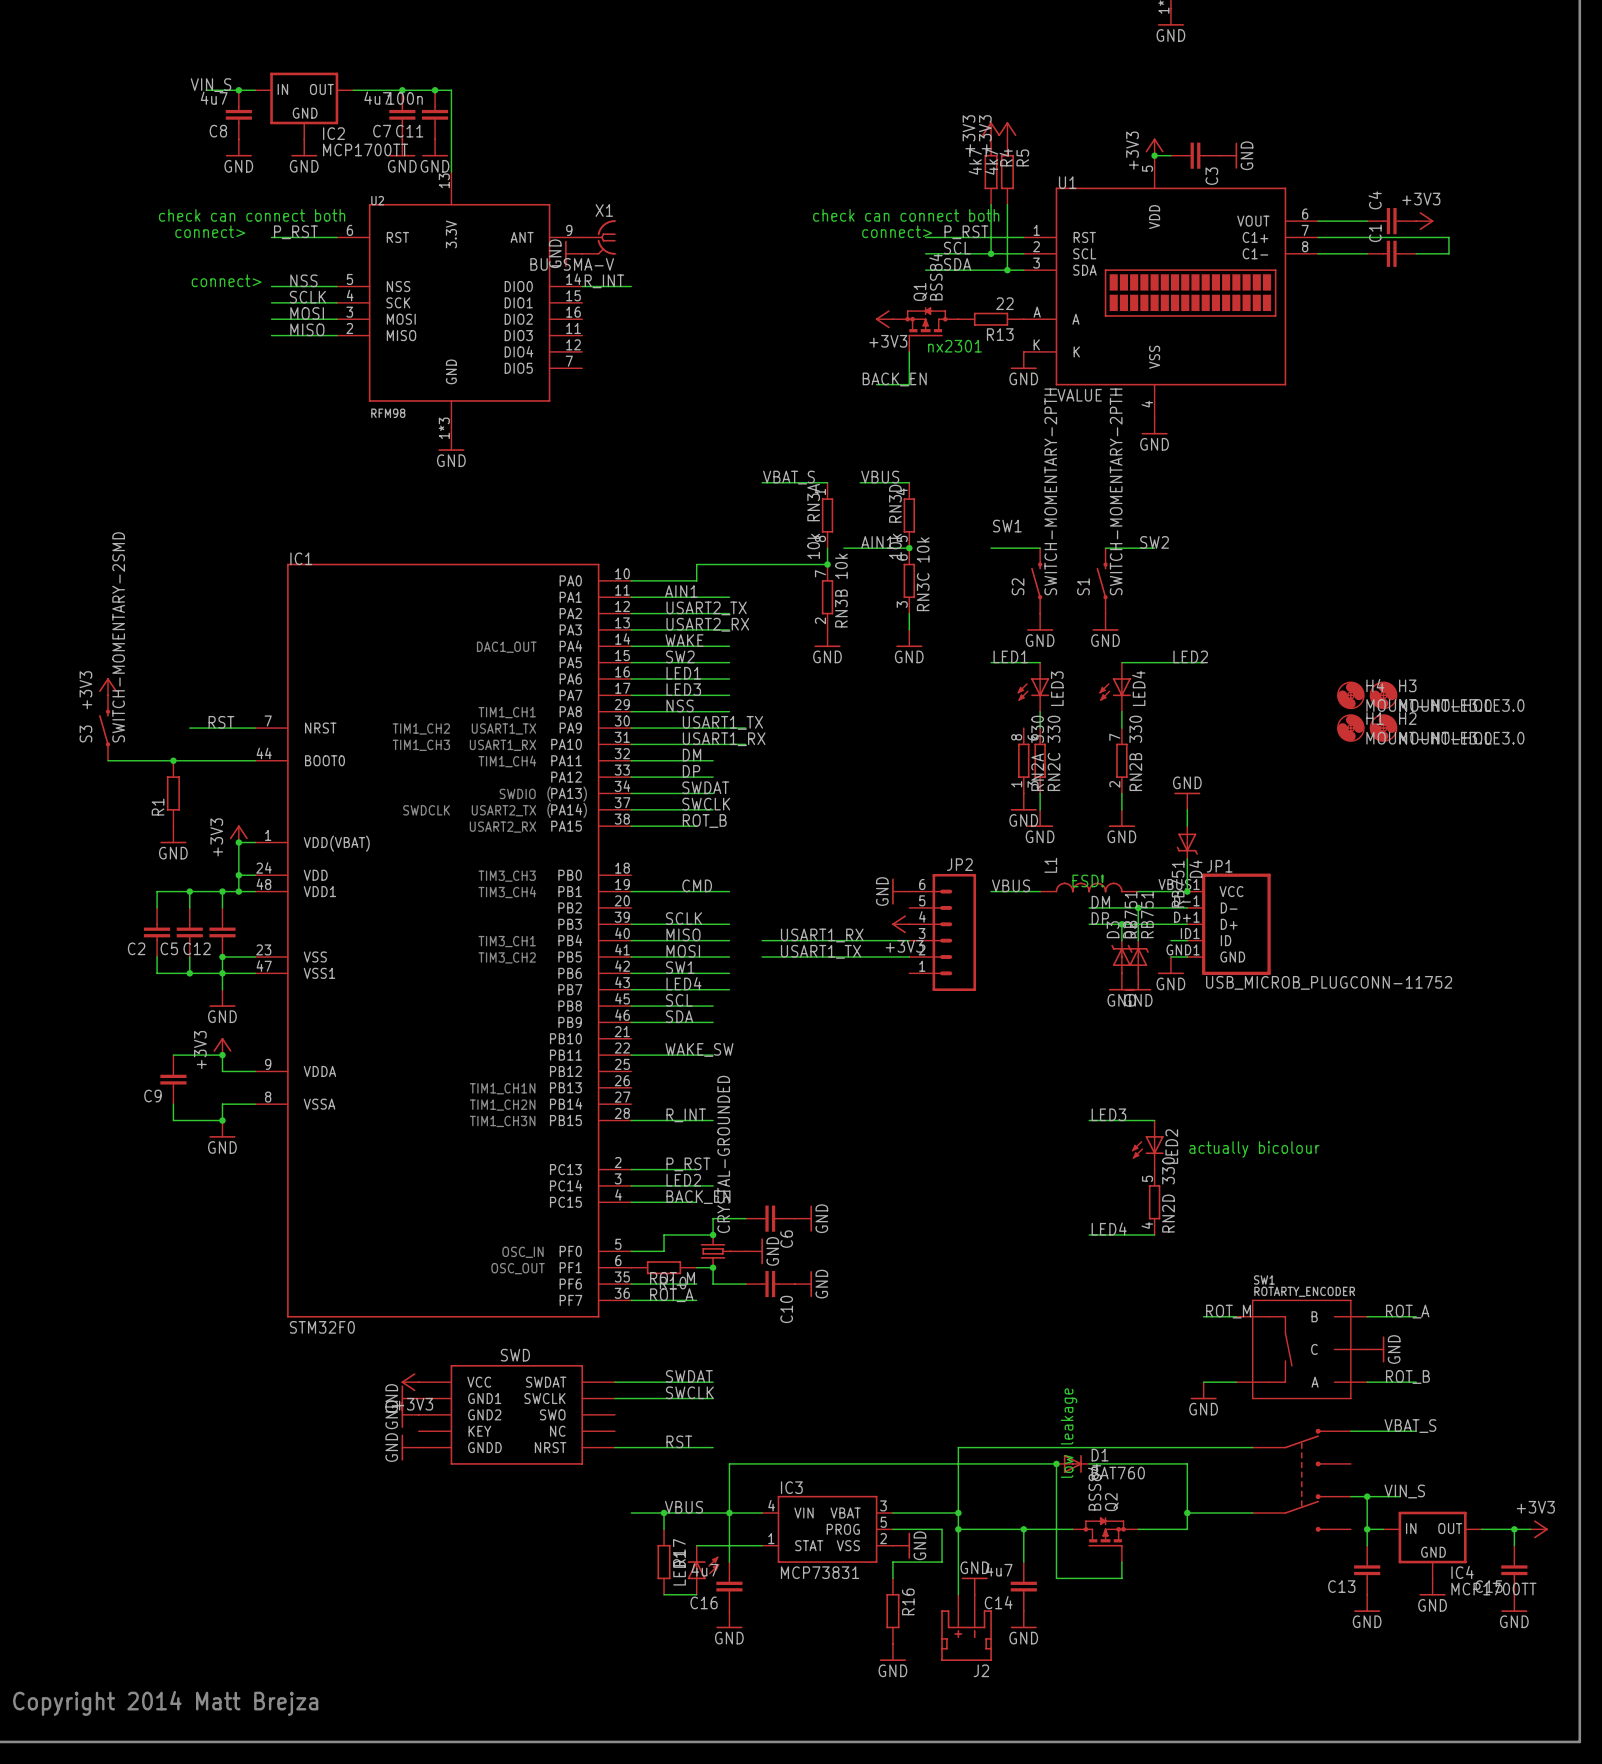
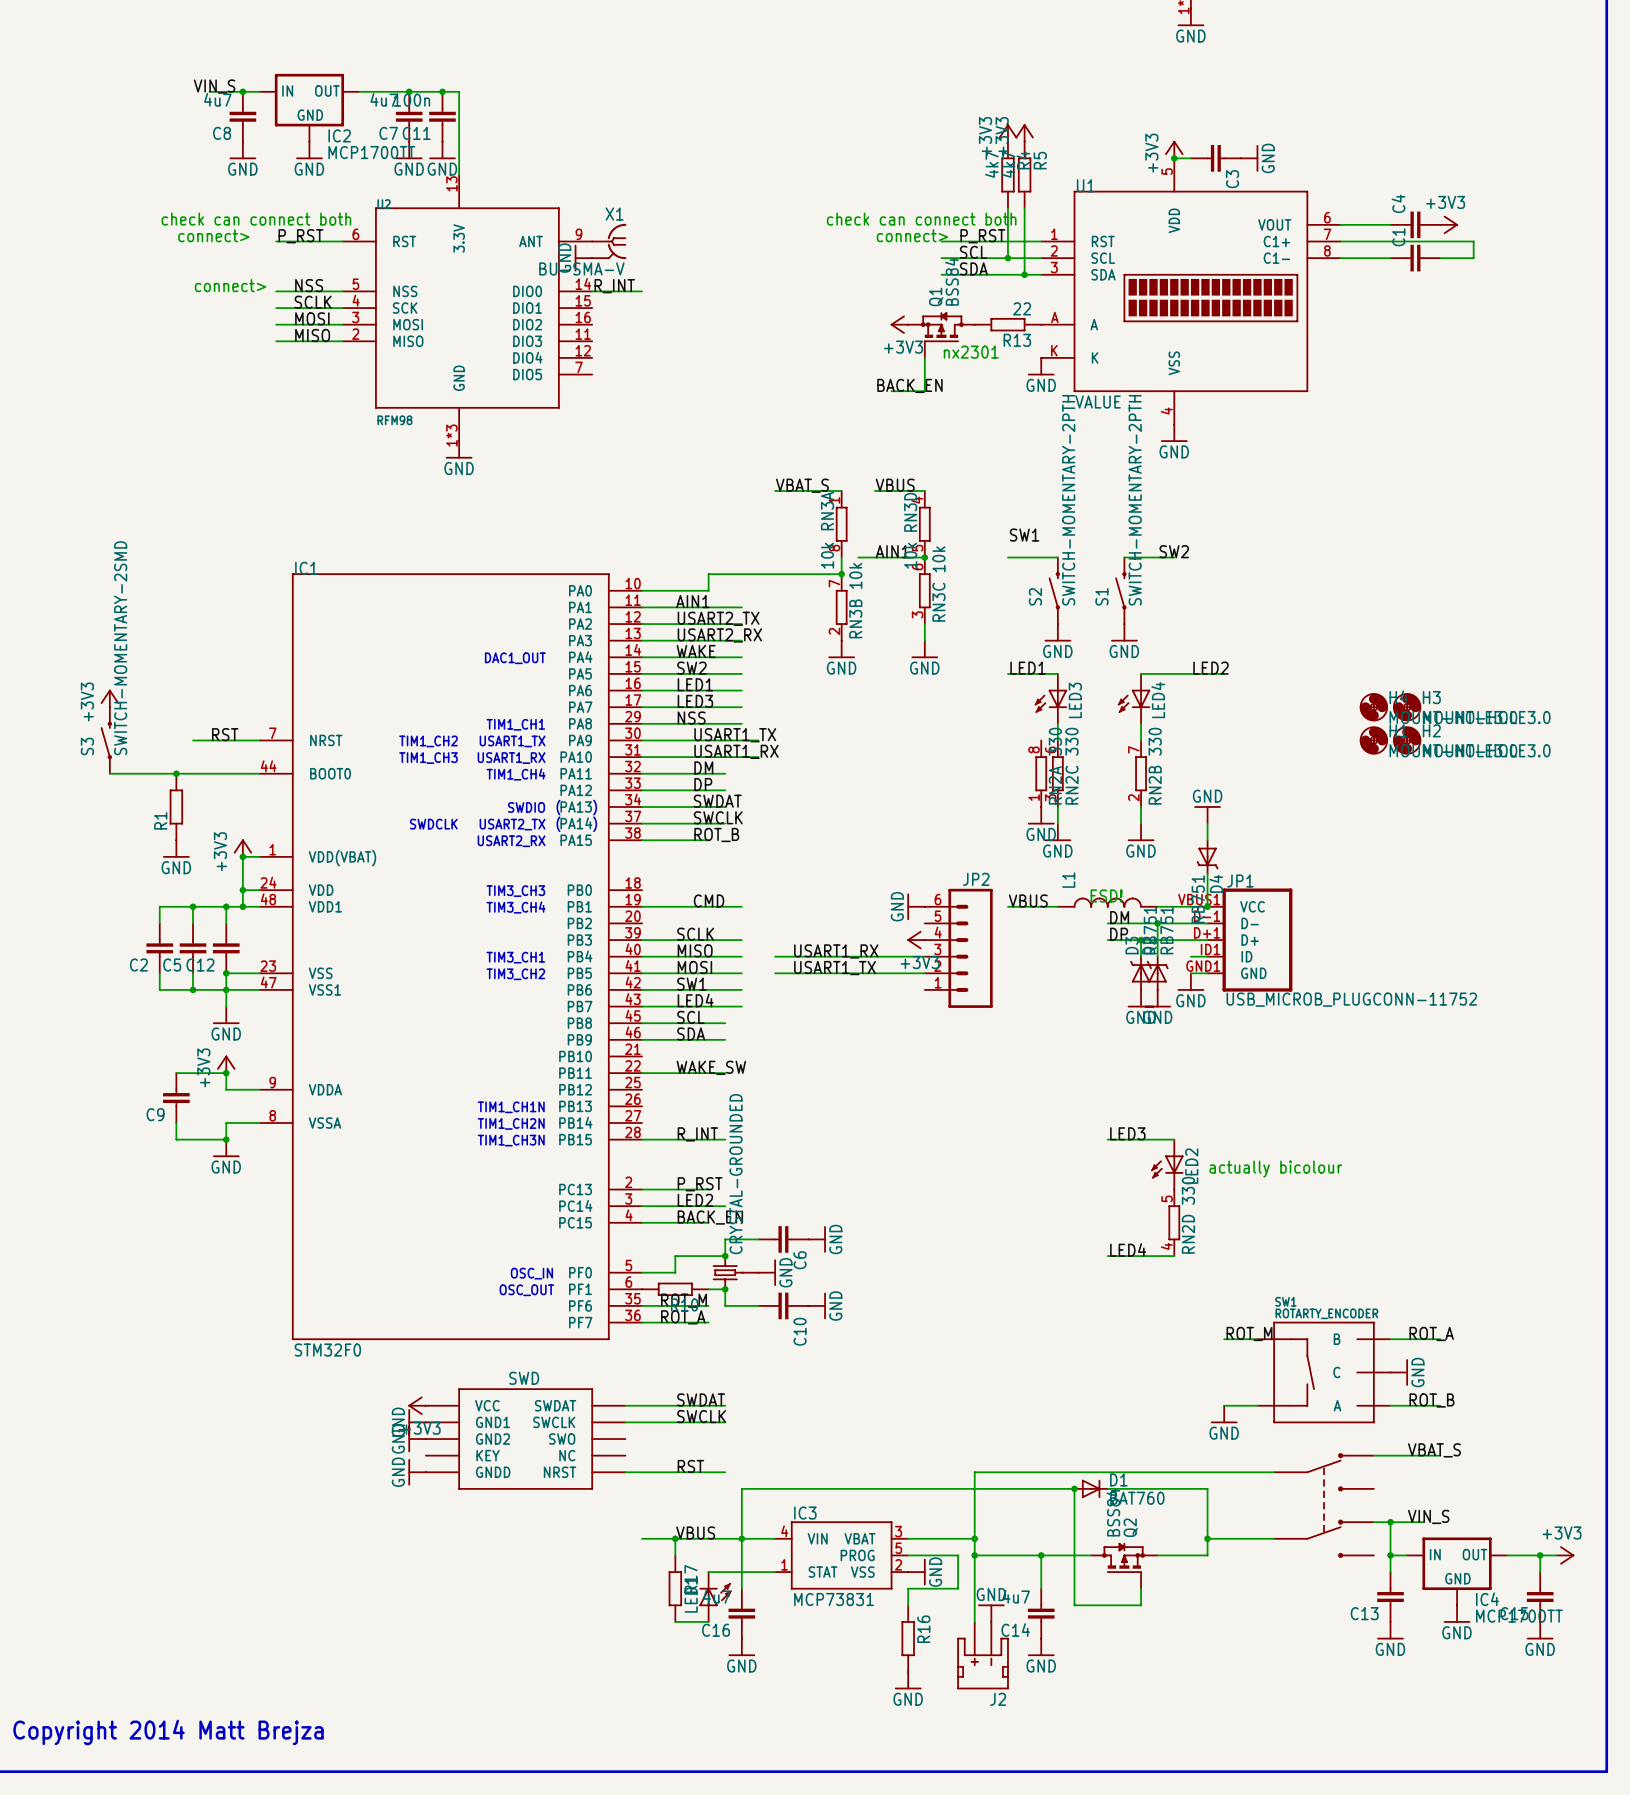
text: low leakage (1069, 1433) -> none

